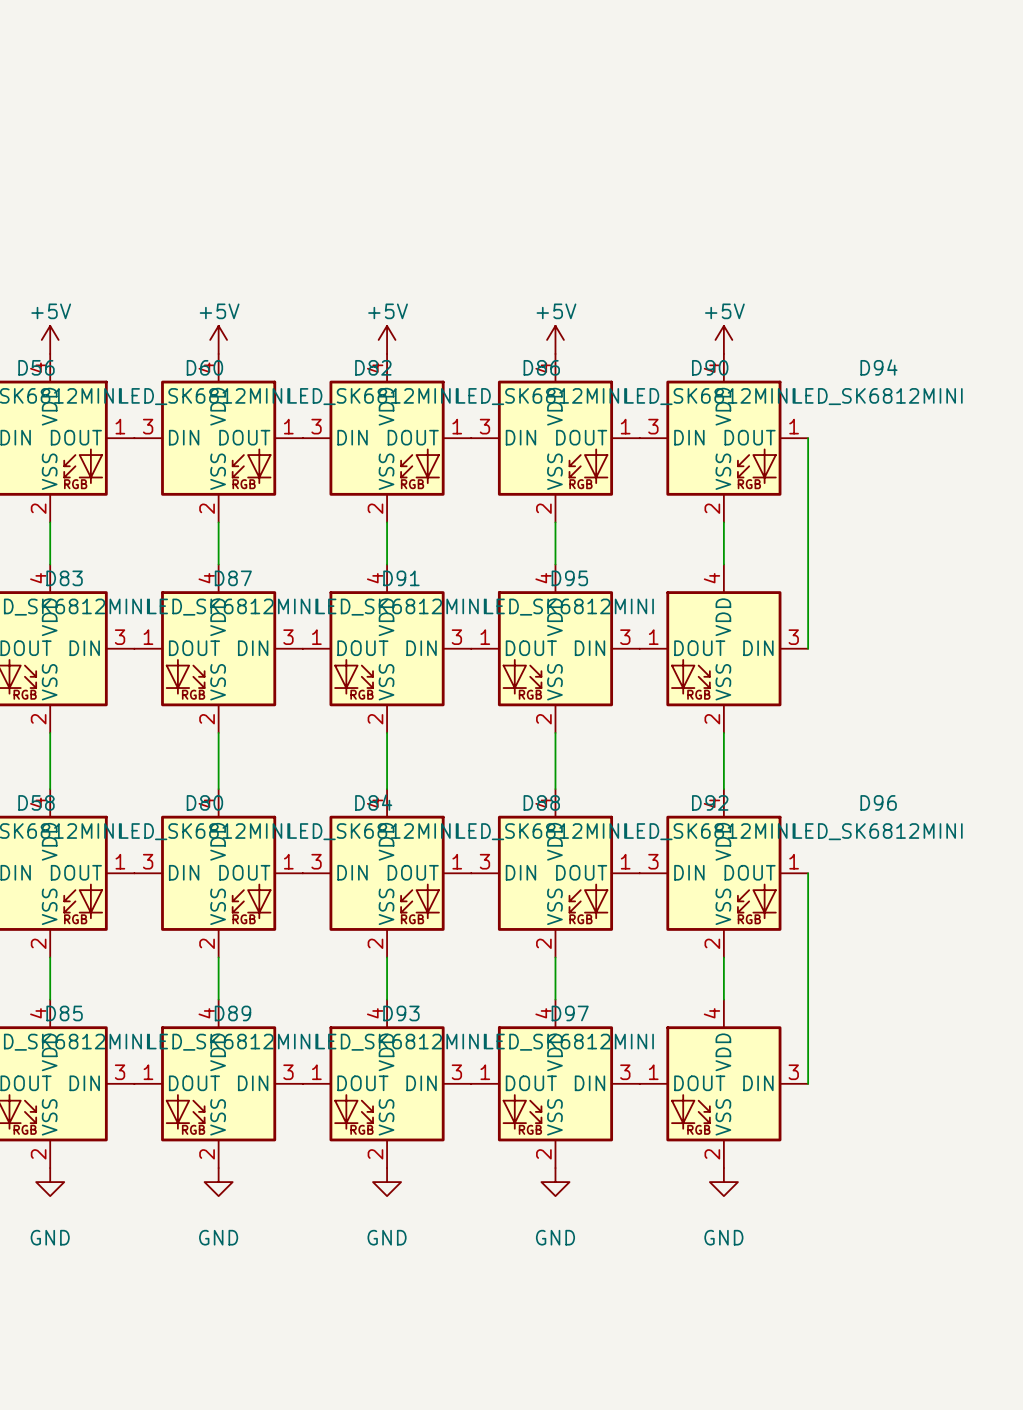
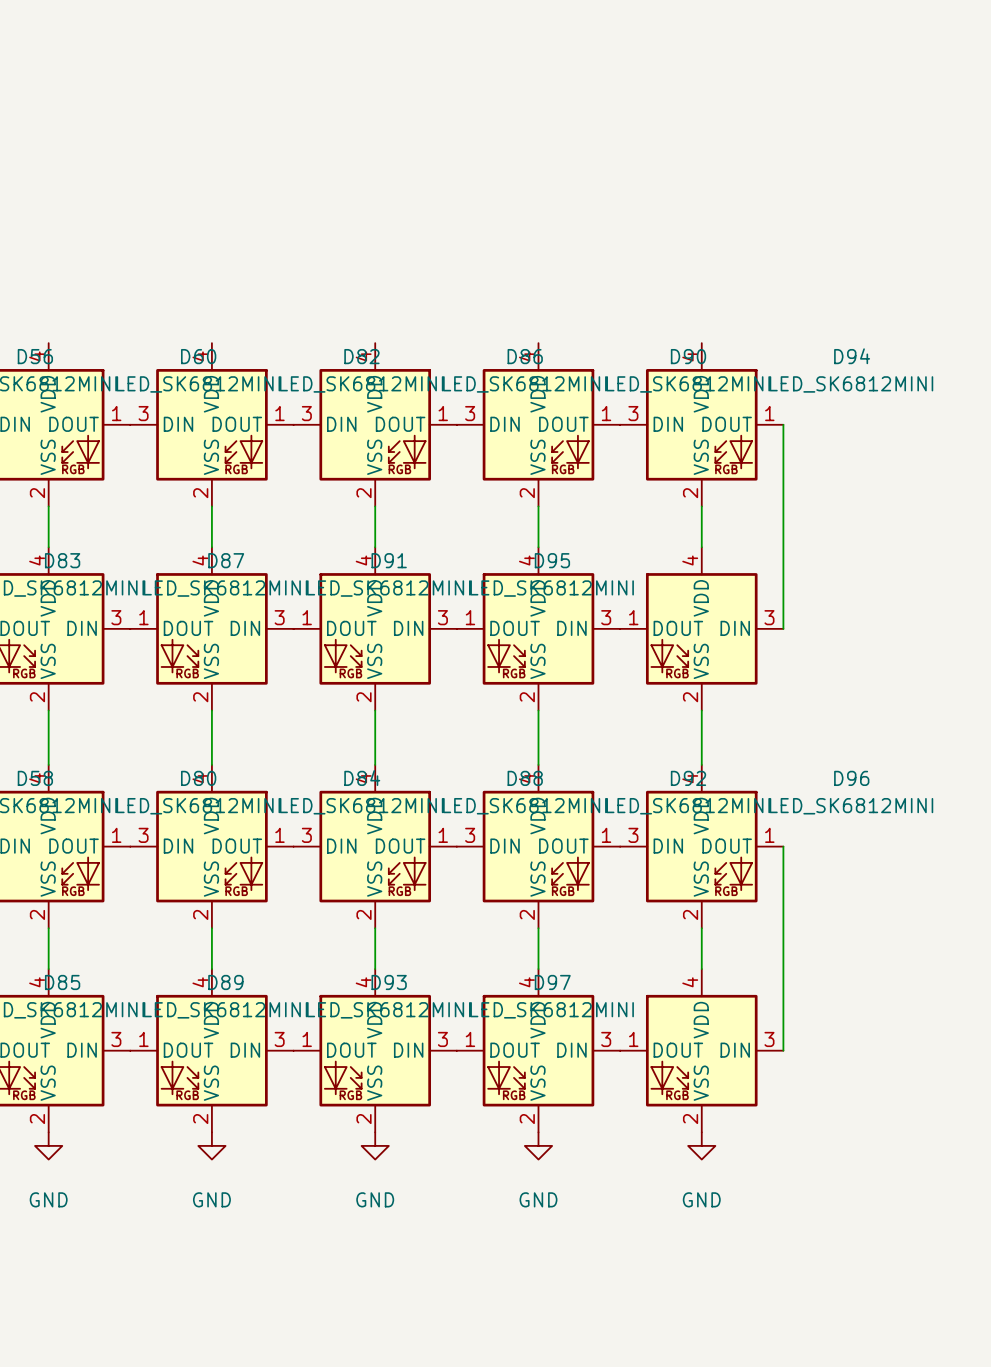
power symbol: +5V (50, 339) -> none
power symbol: +5V (218, 339) -> none
power symbol: +5V (387, 339) -> none
power symbol: +5V (555, 339) -> none
power symbol: +5V (723, 339) -> none

